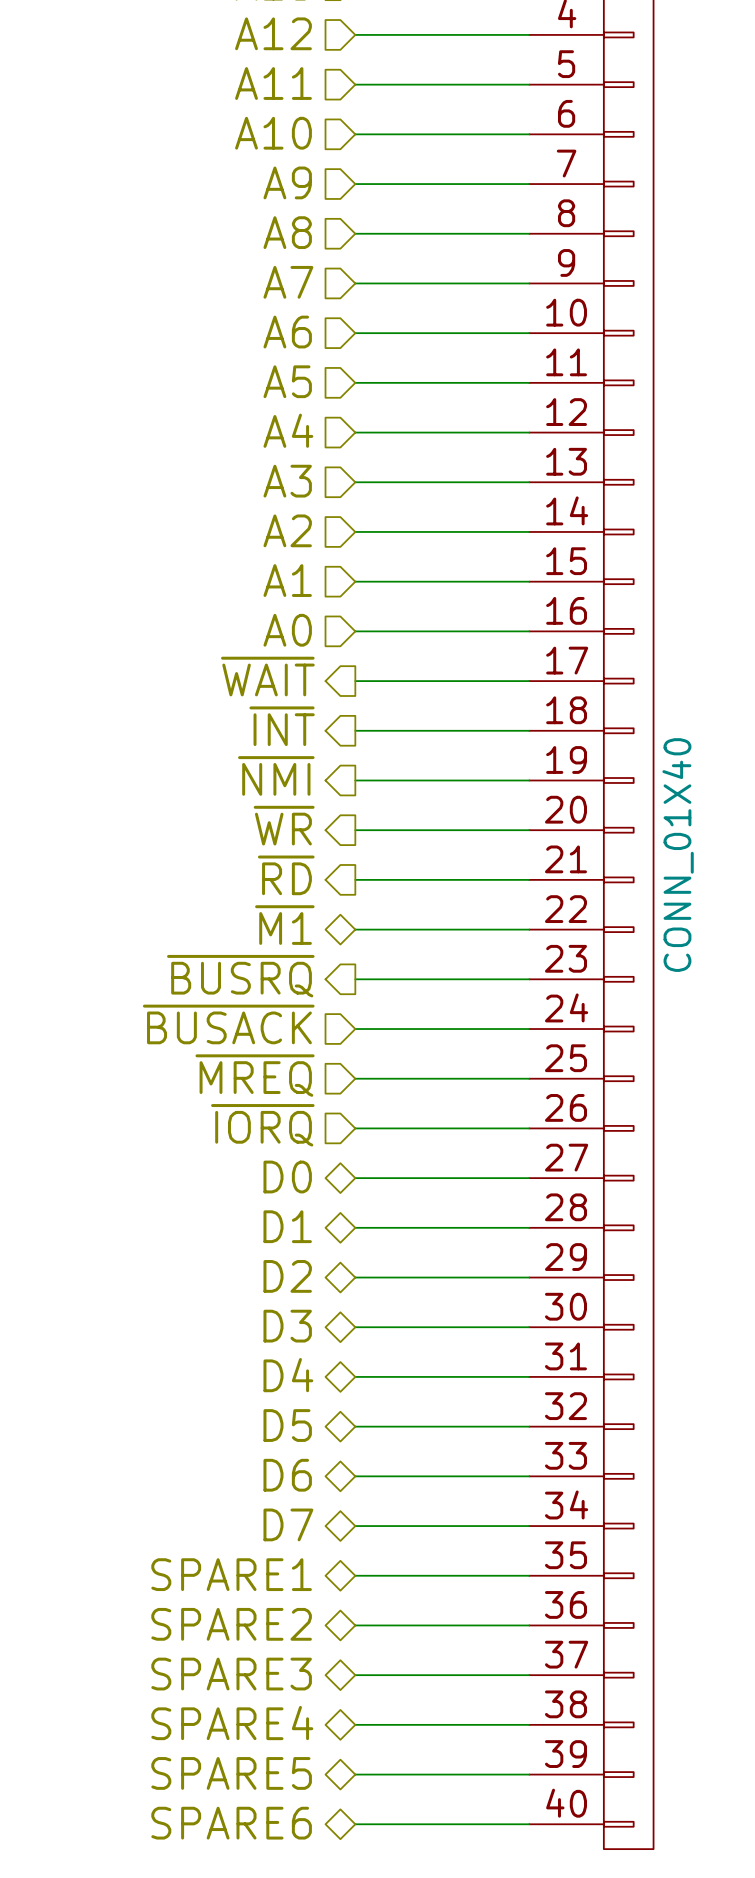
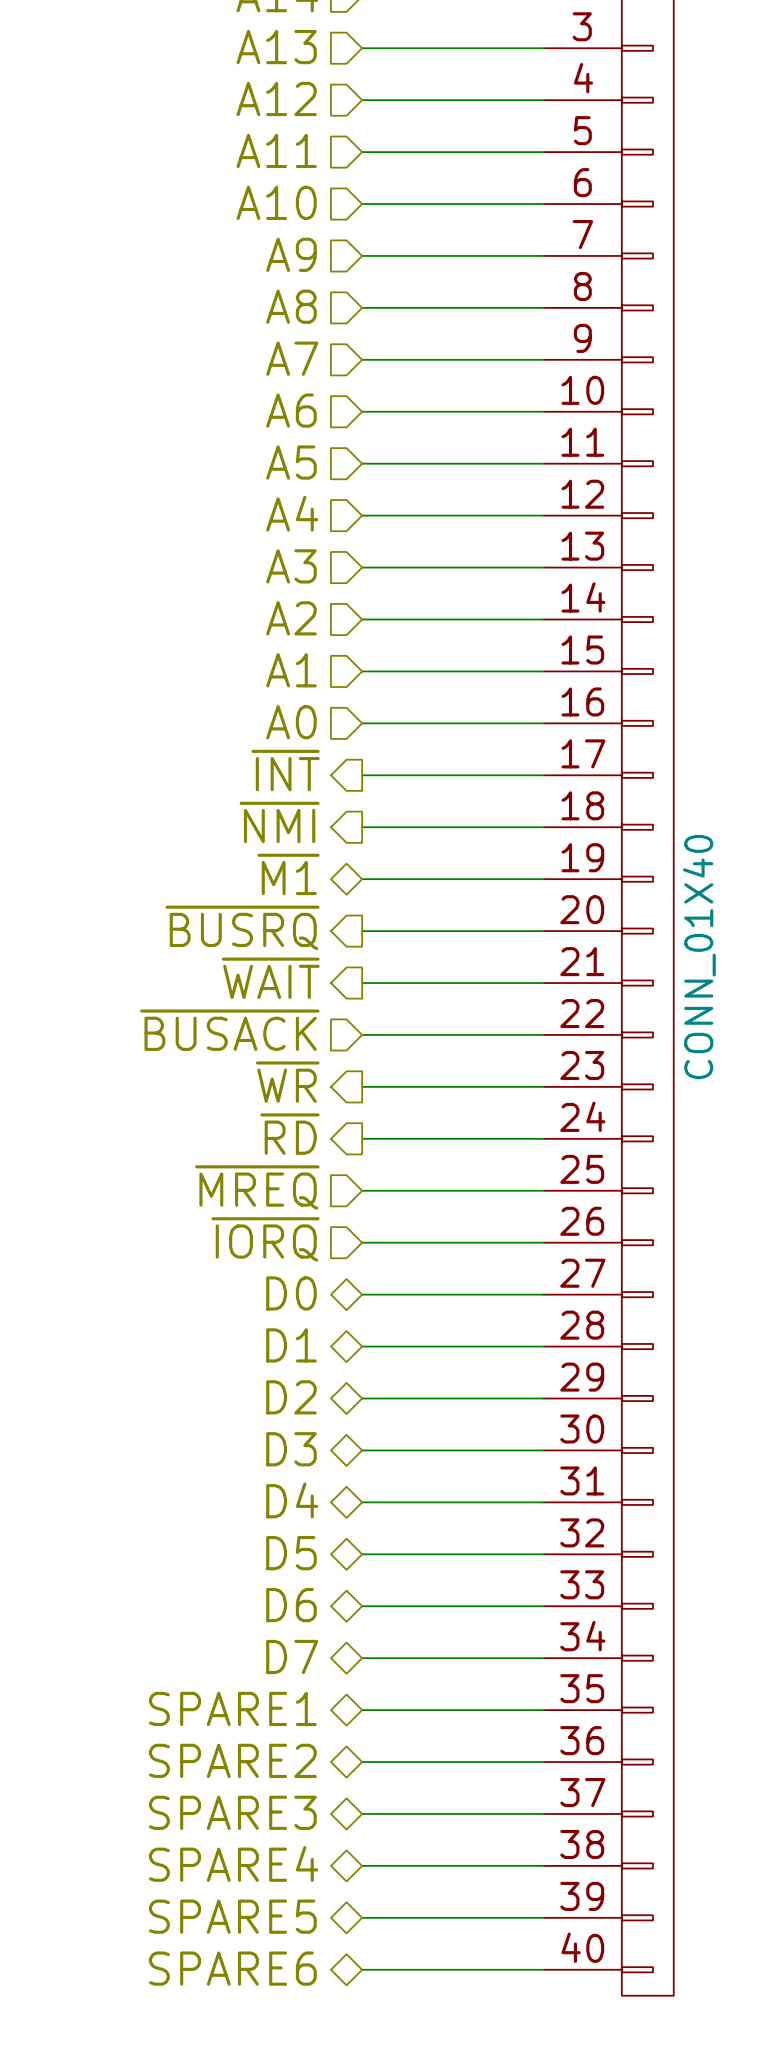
hierarchical label: ~{WAIT} (267, 676) -> ~{INT} (285, 770)
hierarchical label: ~{INT} (282, 726) -> ~{NMI} (279, 822)
hierarchical label shape: output (276, 775) -> bidirectional (288, 874)
hierarchical label: ~{NMI} (276, 775) -> ~{M1} (288, 874)
hierarchical label: ~{WR} (284, 825) -> ~{BUSRQ} (242, 927)
hierarchical label: ~{RD} (286, 875) -> ~{WAIT} (270, 978)
hierarchical label shape: bidirectional (284, 925) -> input (229, 1030)
hierarchical label: ~{M1} (284, 925) -> ~{BUSACK} (229, 1030)
hierarchical label: ~{BUSRQ} (240, 976) -> ~{WR} (287, 1082)
hierarchical label shape: input (228, 1024) -> output (289, 1134)
hierarchical label: ~{BUSACK} (228, 1024) -> ~{RD} (289, 1134)

